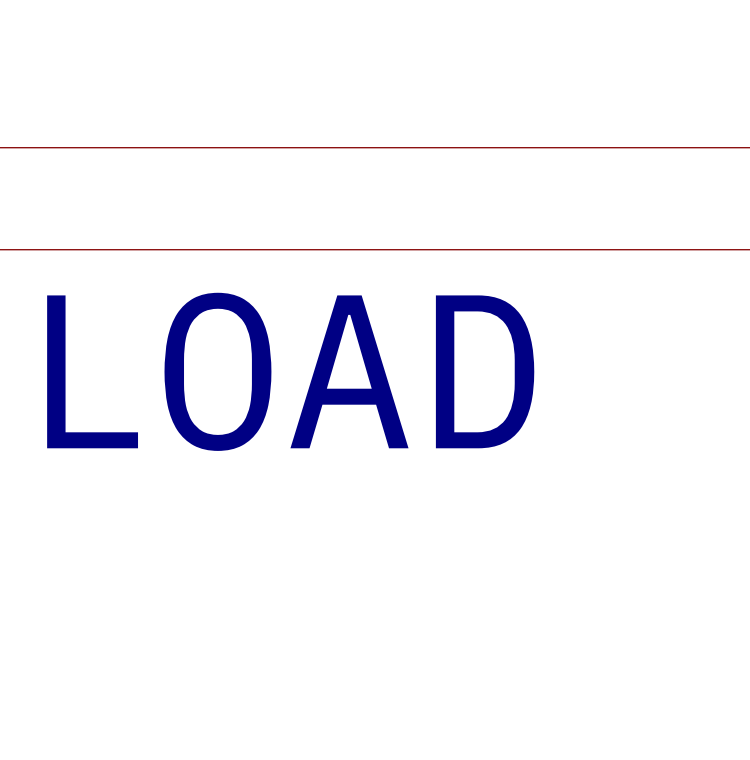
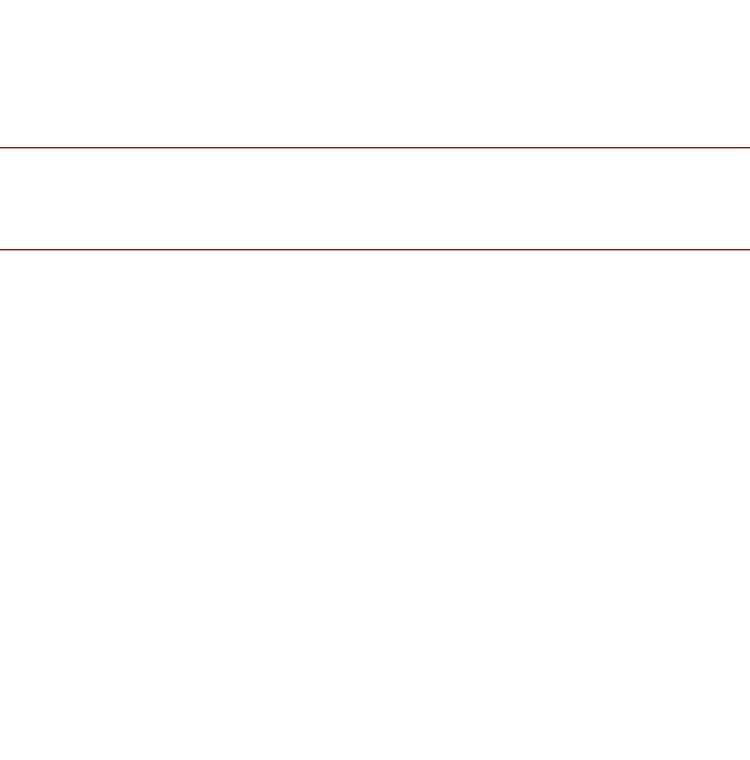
text: LOAD (290, 371) -> none

